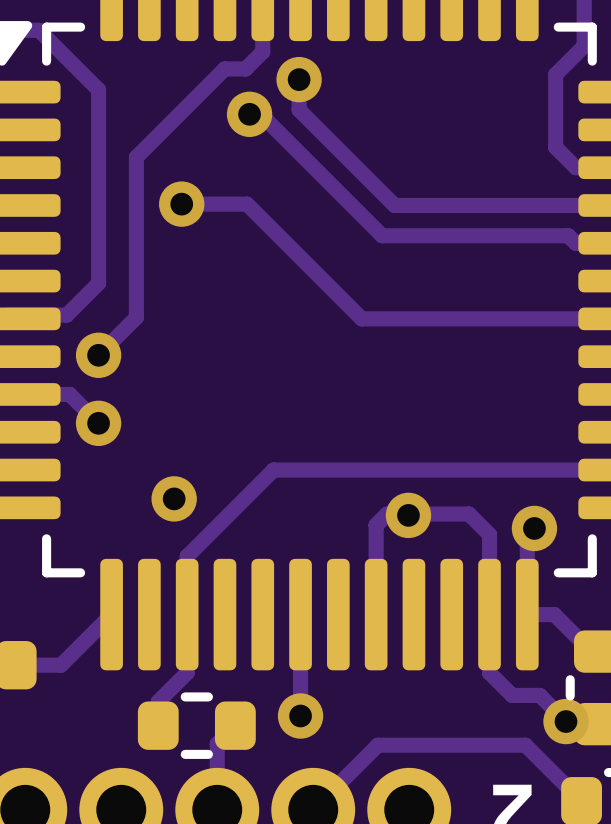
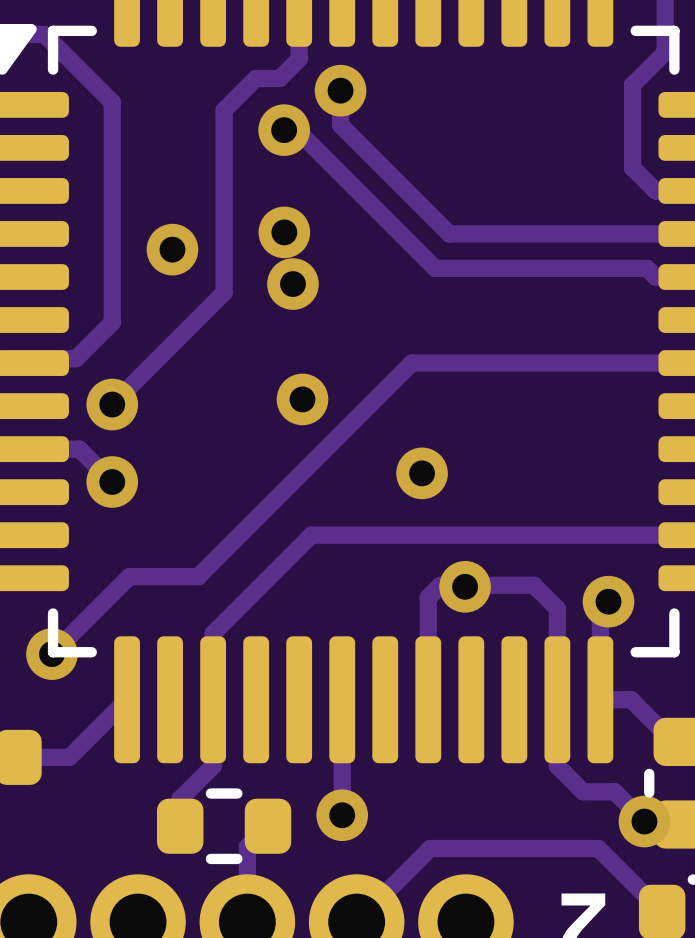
track: (196, 96) (136, 157) (136, 317) -> (224, 110) (224, 292) (155, 361)
track: (181, 204) (247, 204) (361, 318) -> (52, 654) (129, 576) (198, 576) (411, 363)
via position: (181, 204) -> (172, 249)
via: none -> (284, 232)
via: none -> (292, 284)
via: none -> (302, 399)
via: none -> (422, 473)
via: (174, 498) -> none
via: none -> (52, 654)

